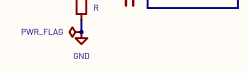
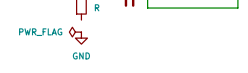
wire: (81, 20) (81, 32) -> none
junction: (81, 32) -> none

